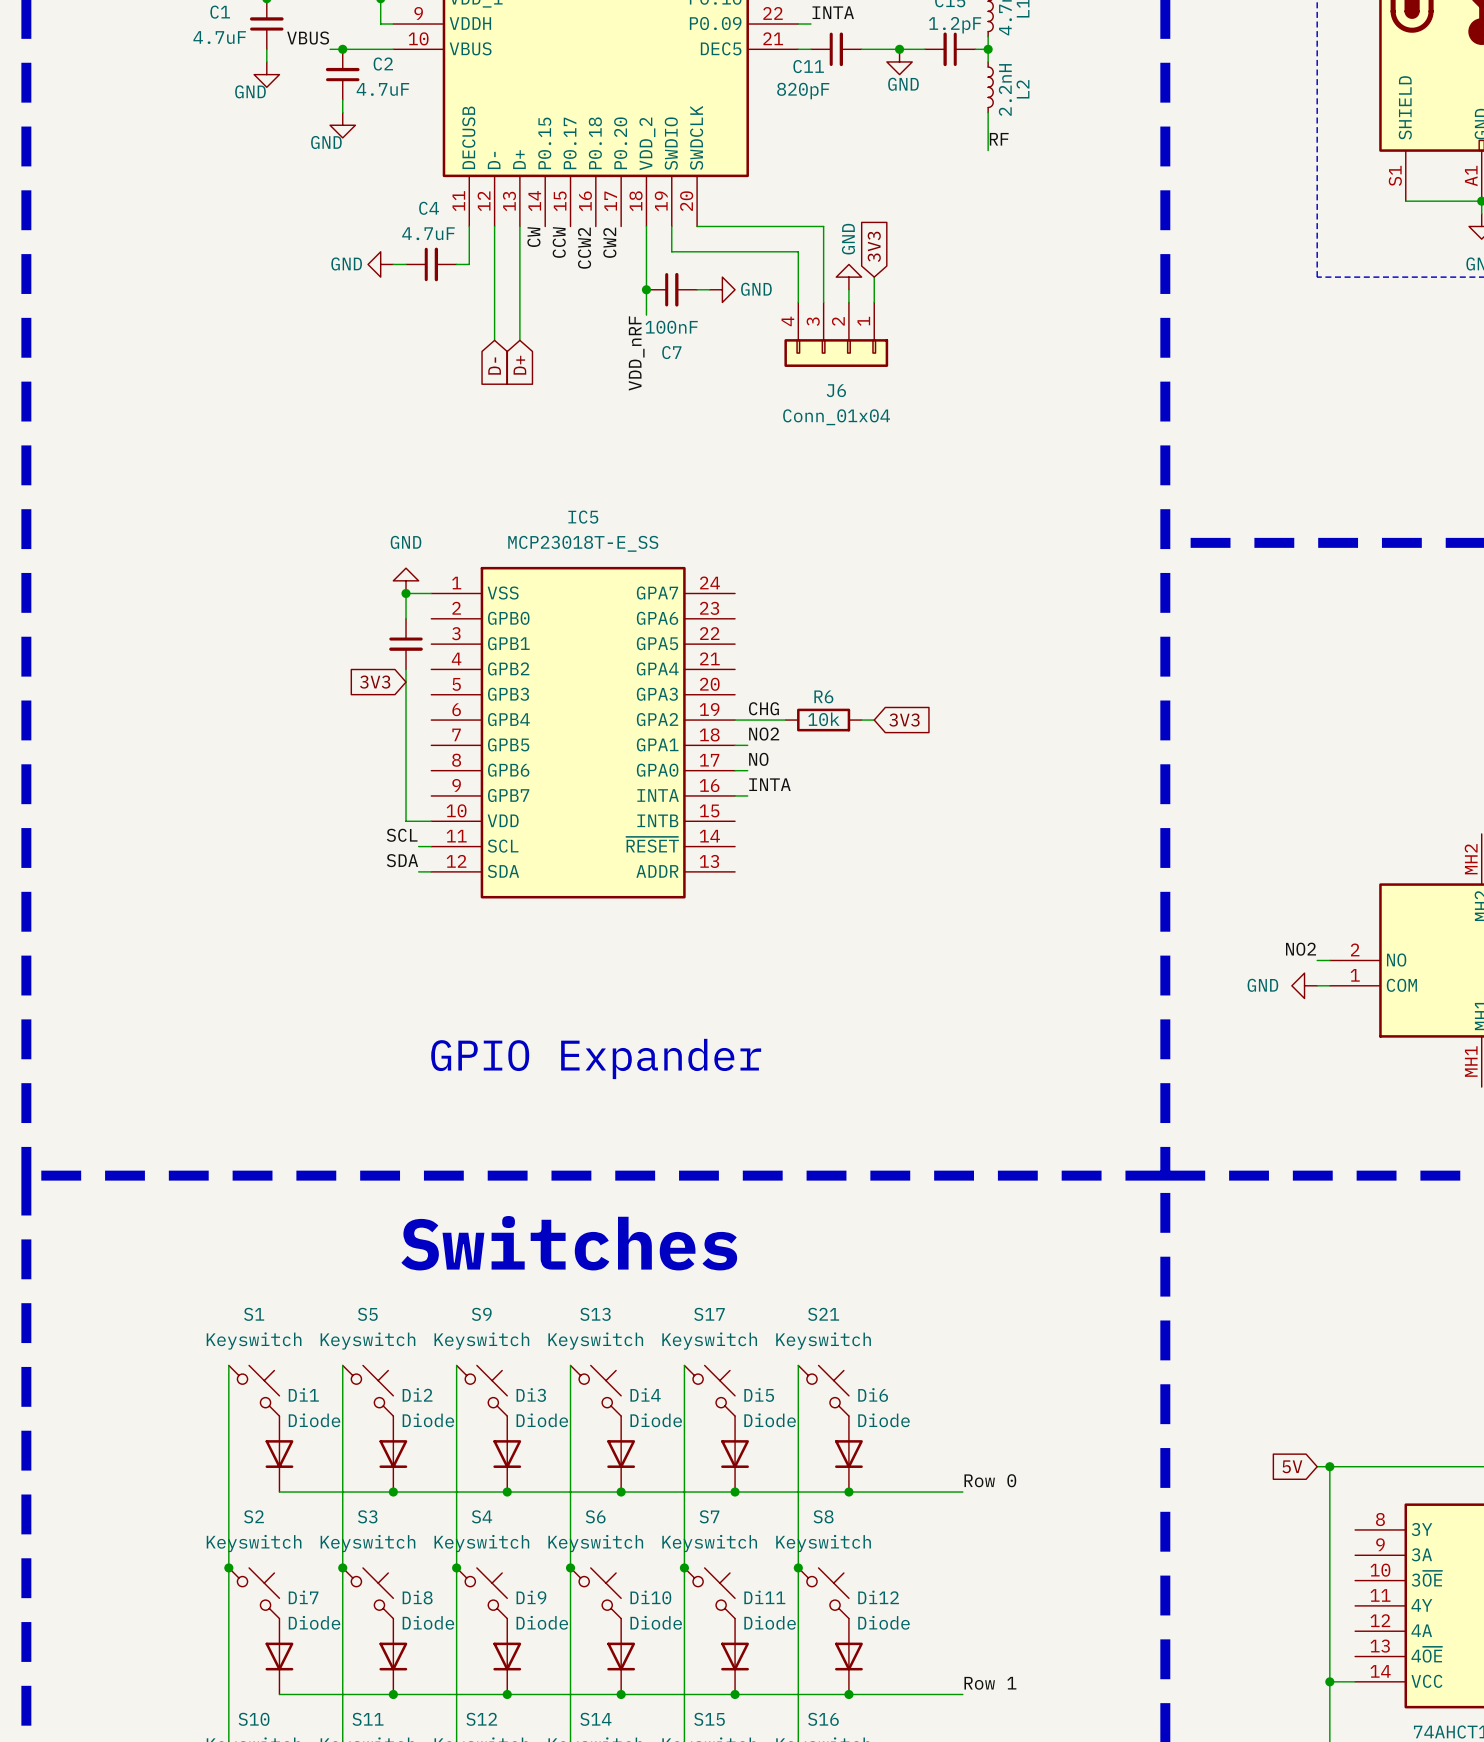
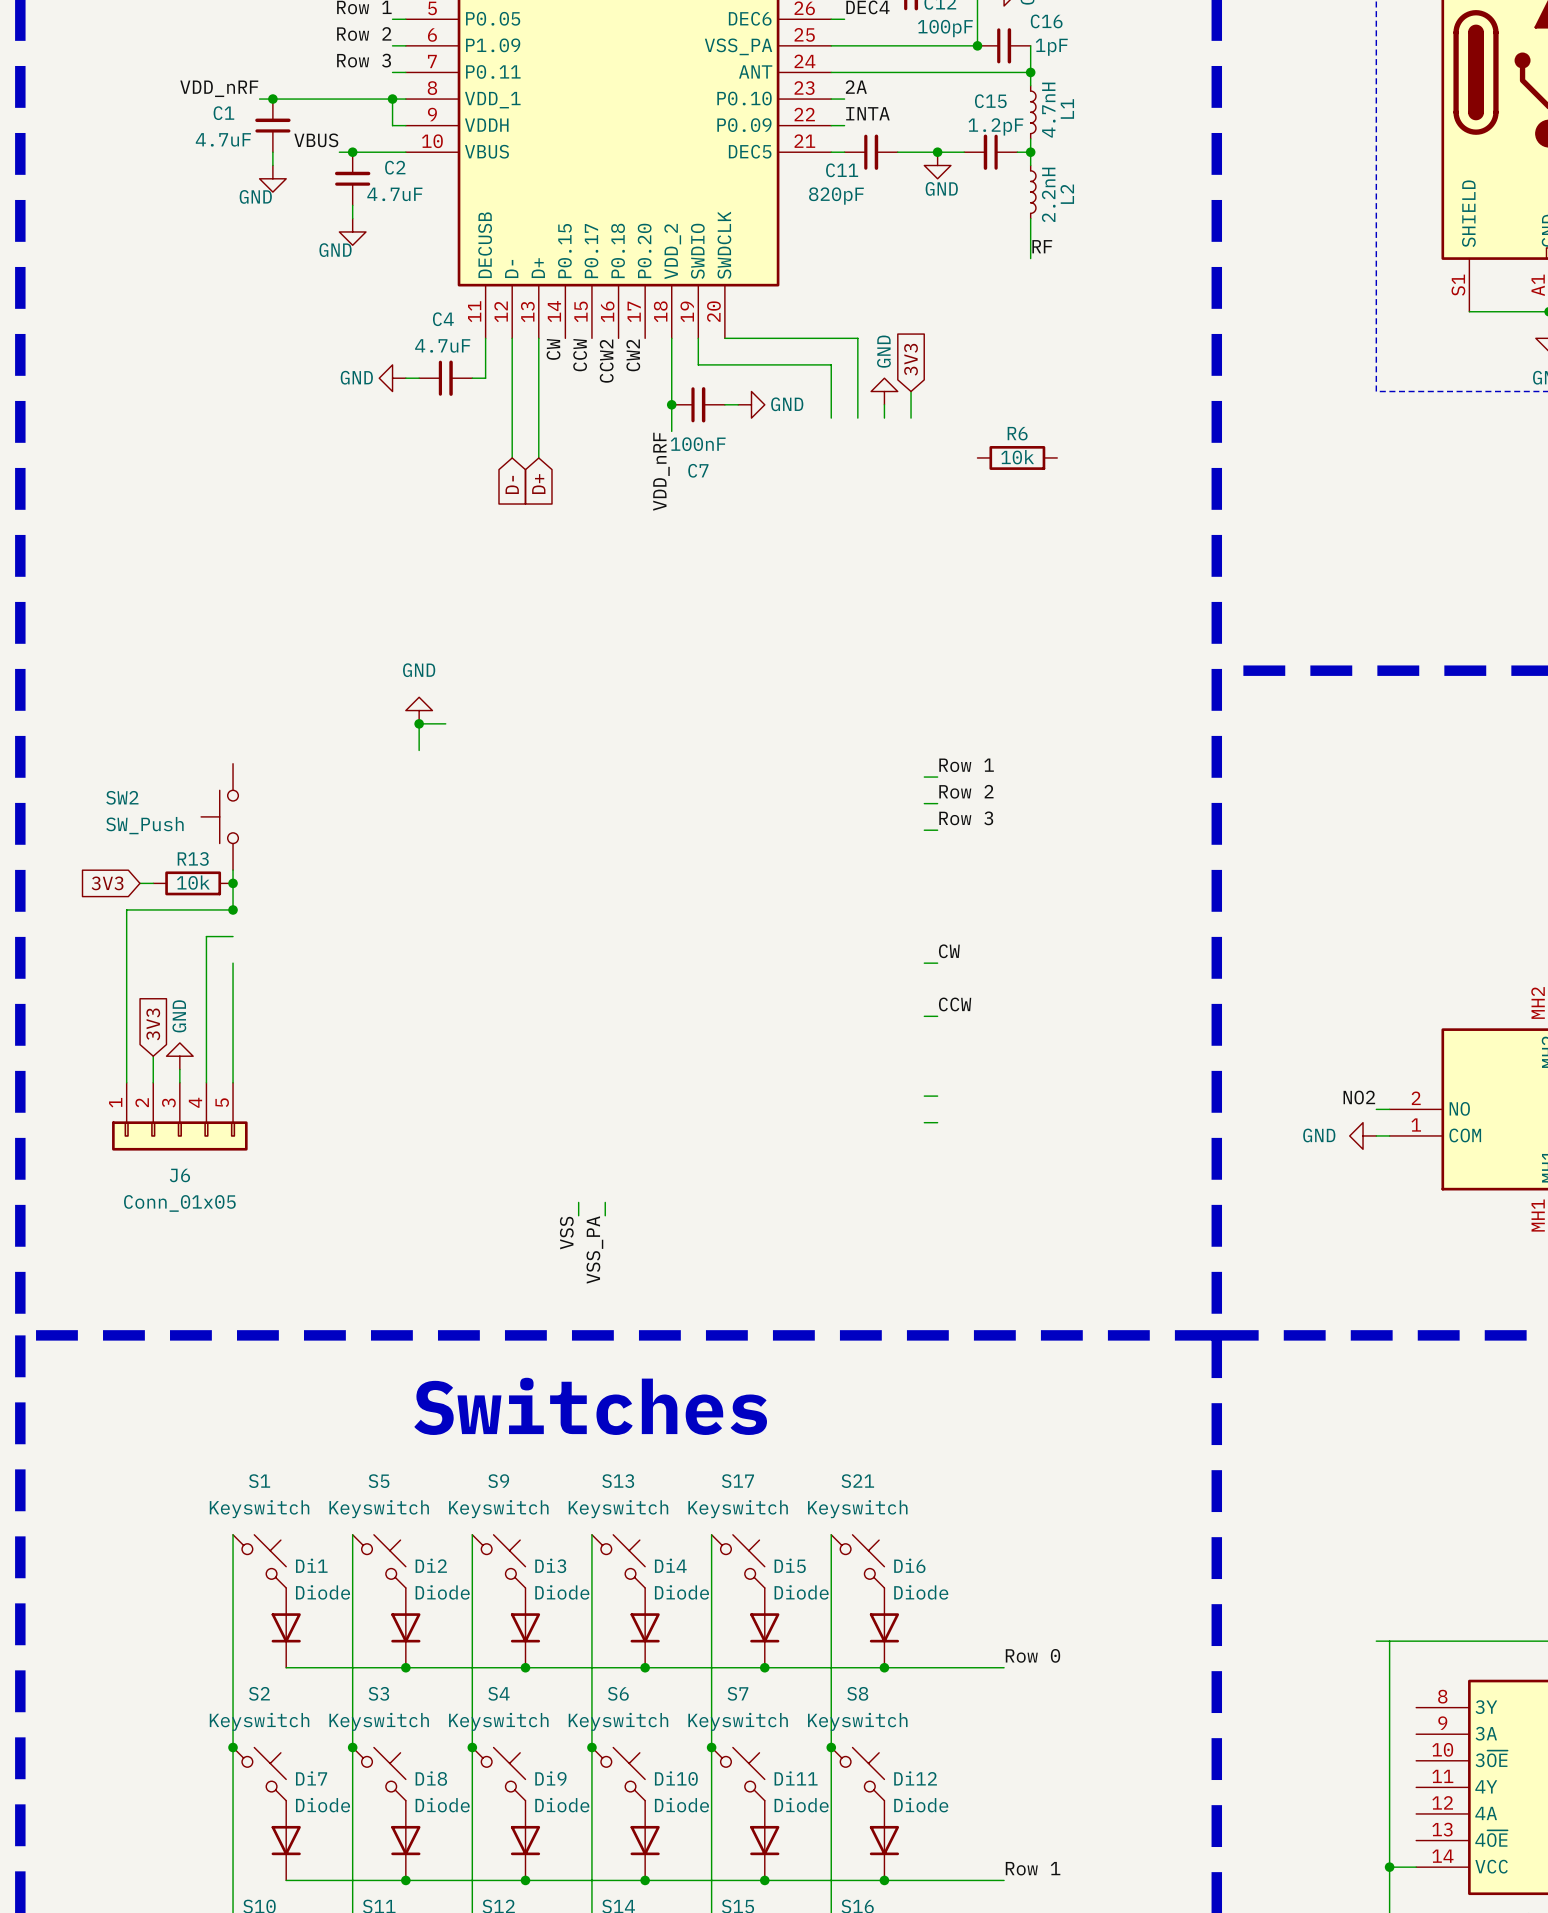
J6 symbol: [784, 302, 889, 367] -> [112, 1082, 248, 1151]
J6 value: Conn_01x04 (836, 417) -> Conn_01x05 (179, 1203)
label: none -> Row 1 (966, 765)
part: (406, 644) -> none
label: none -> Row 2 (966, 791)
wire: (406, 669) (406, 821) (431, 821) -> none
SW2: none -> SW_Push (219, 816)
global label: 3V3 (375, 682) -> none
label: none -> Row 3 (966, 818)
label: CHG (763, 708) -> none
wire: (735, 720) (785, 720) -> none
R6 position: (823, 720) -> (1017, 457)
wire: (861, 720) (874, 720) -> (924, 963) (937, 963)
global label: 3V3 (904, 720) -> none
wire: none -> (233, 870) (233, 909) (126, 909) (126, 1082)
IC5: MCP23018T-E_SS (583, 732) -> none
label: NO2 (764, 734) -> none
global label: none -> 3V3 (107, 883)
wire: none -> (139, 883) (153, 883)
R13: none -> 10k (193, 883)
junction: none -> (233, 883)
wire: (735, 745) (747, 745) -> (924, 777) (937, 777)
label: NO (758, 759) -> none
junction: none -> (233, 909)
wire: (735, 770) (747, 770) -> (924, 803) (937, 803)
label: INTA (769, 784) -> none
wire: none -> (233, 936) (206, 936) (206, 1082)
wire: (735, 795) (747, 795) -> (924, 830) (937, 830)
label: none -> CW (949, 951)
wire: none -> (233, 963) (233, 1082)
label: SCL (402, 835) -> none
wire: (418, 846) (431, 846) -> none
label: SDA (402, 860) -> none
label: none -> CCW (955, 1004)
wire: (418, 871) (431, 871) -> none
wire: none -> (924, 1016) (937, 1016)
global label: none -> 3V3 (153, 1024)
wire: none -> (153, 1056) (153, 1082)
power symbol: none -> GND (179, 1056)
wire: none -> (179, 1069) (179, 1082)
wire: none -> (924, 1096) (937, 1096)
wire: none -> (924, 1122) (937, 1122)
wire: none -> (578, 1202) (578, 1215)
wire: none -> (605, 1202) (605, 1215)
text: GPIO Expander (596, 1058) -> none
label: none -> VSS (566, 1233)
label: none -> VSS_PA (594, 1249)
global label: 5V (1292, 1466) -> none
junction: (1329, 1466) -> none

